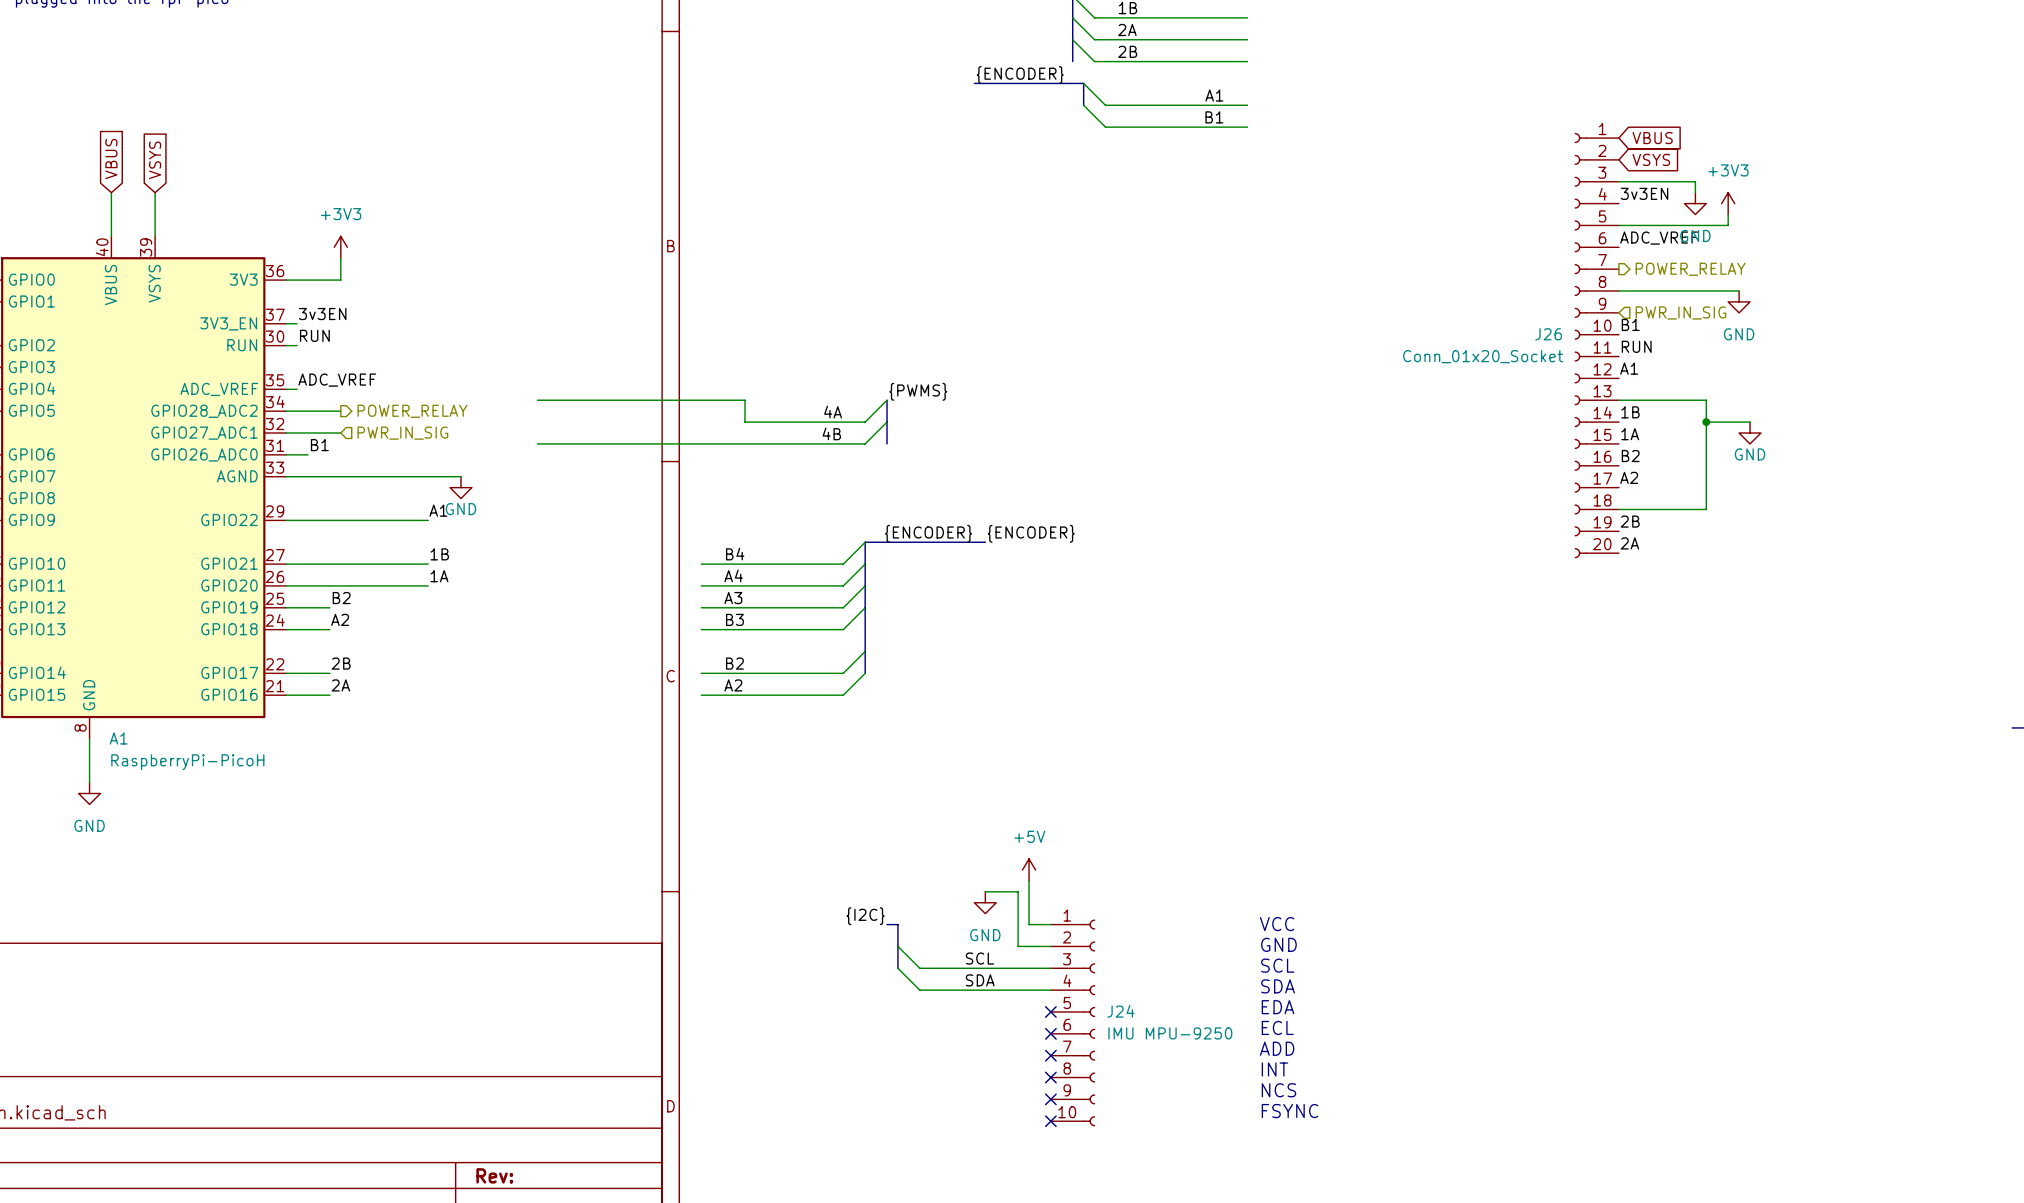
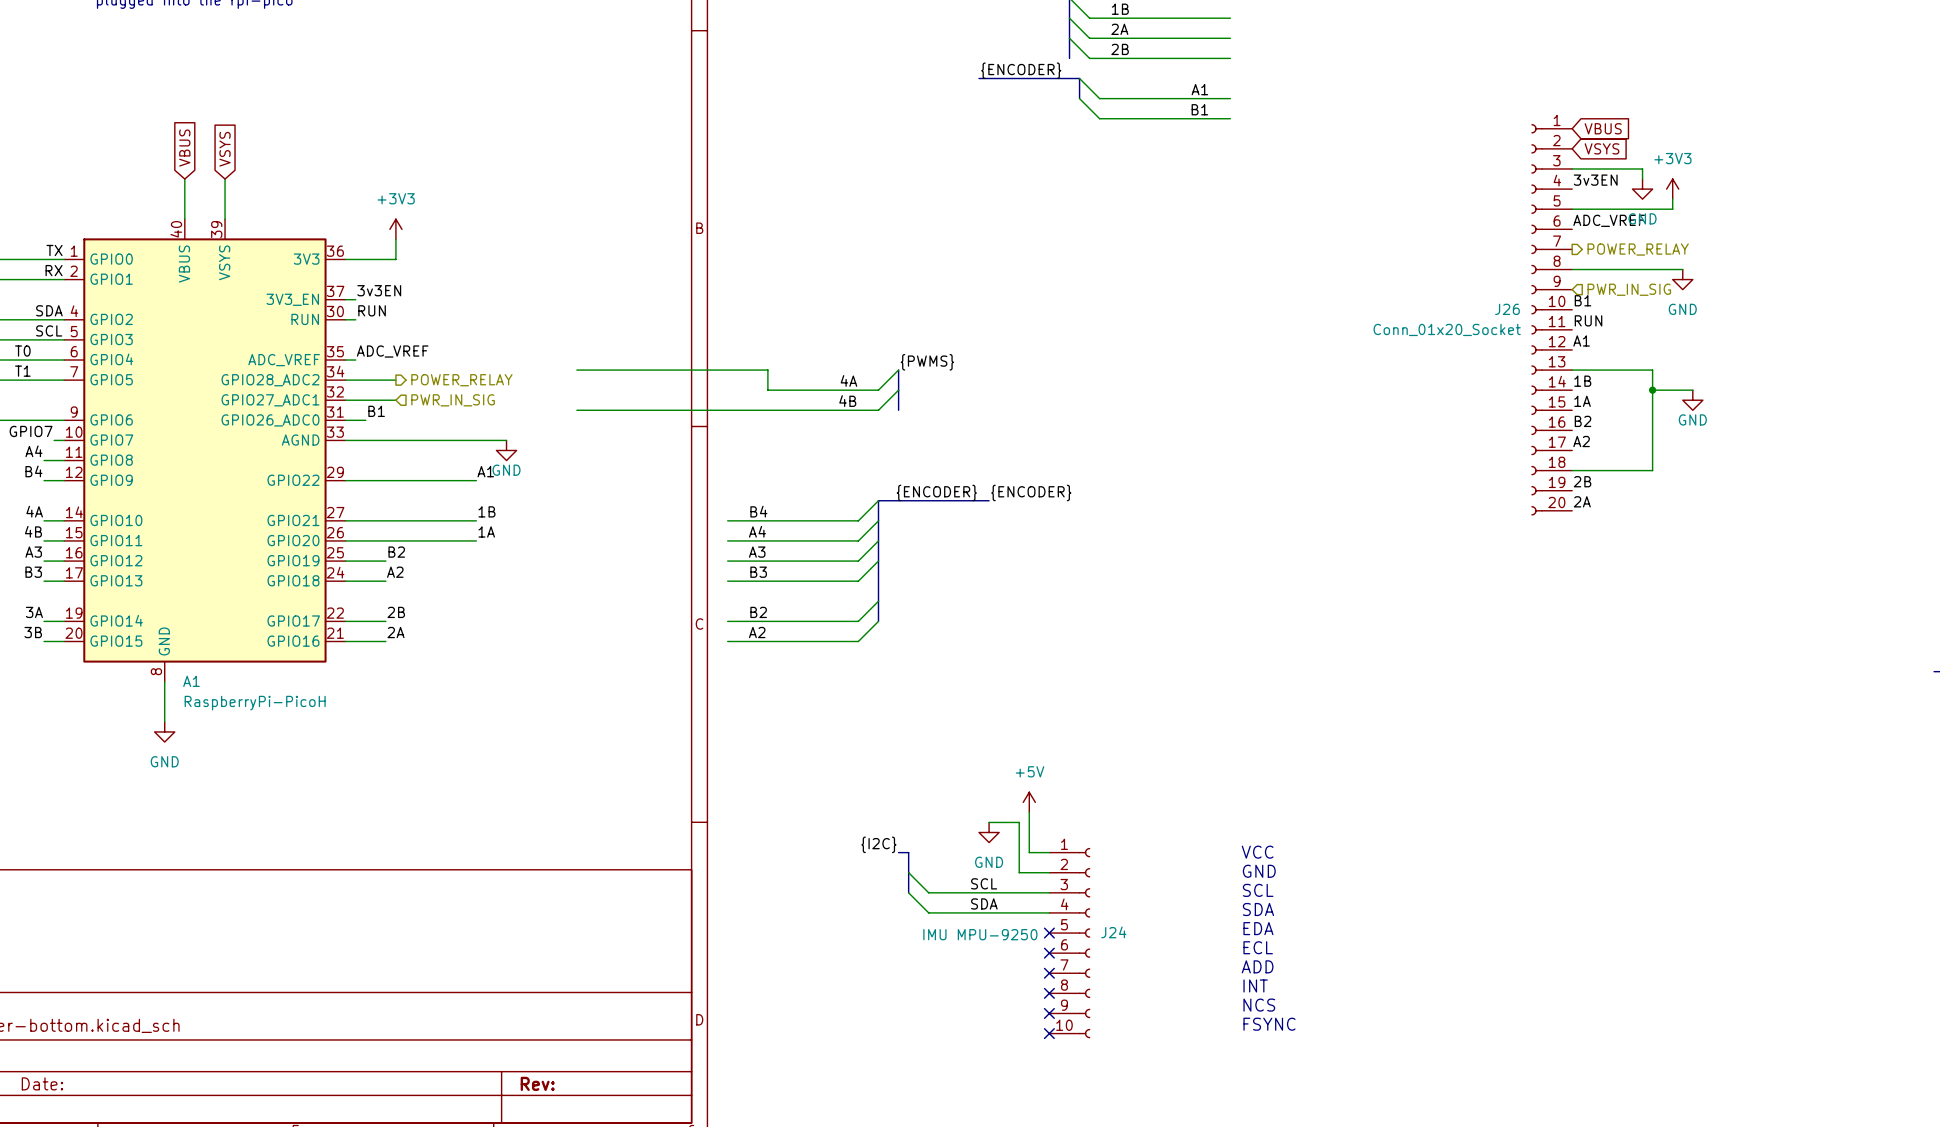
J24 value position: IMU MPU-9250 (1170, 1033) -> IMU MPU-9250 (980, 934)

